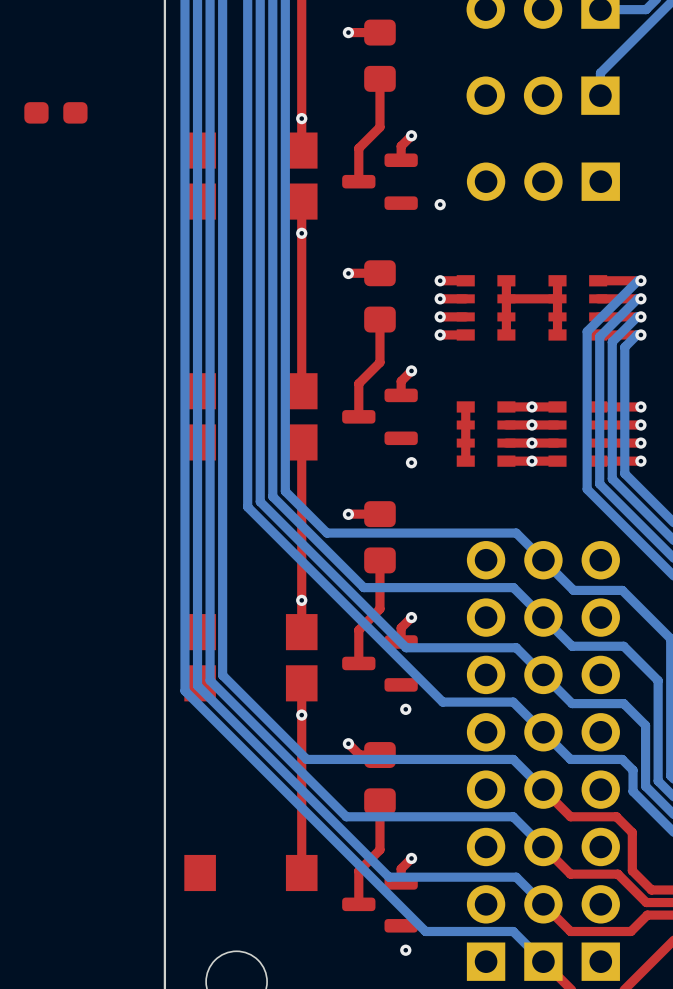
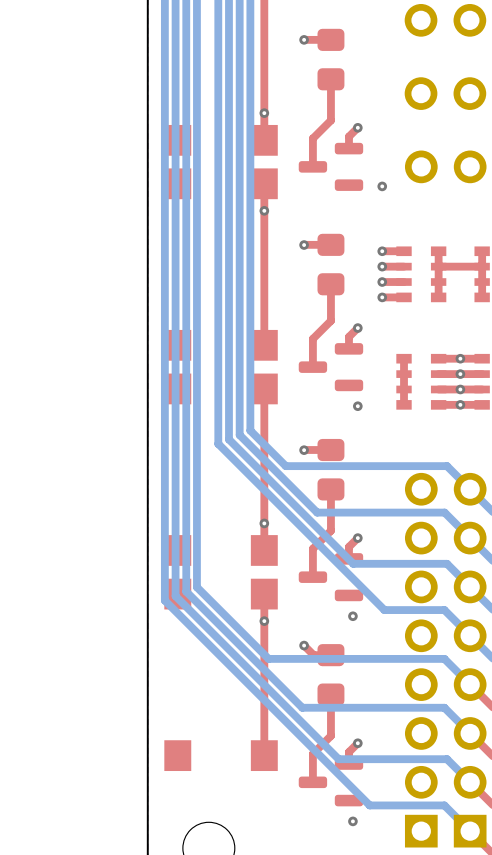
part: (55, 112) -> none

